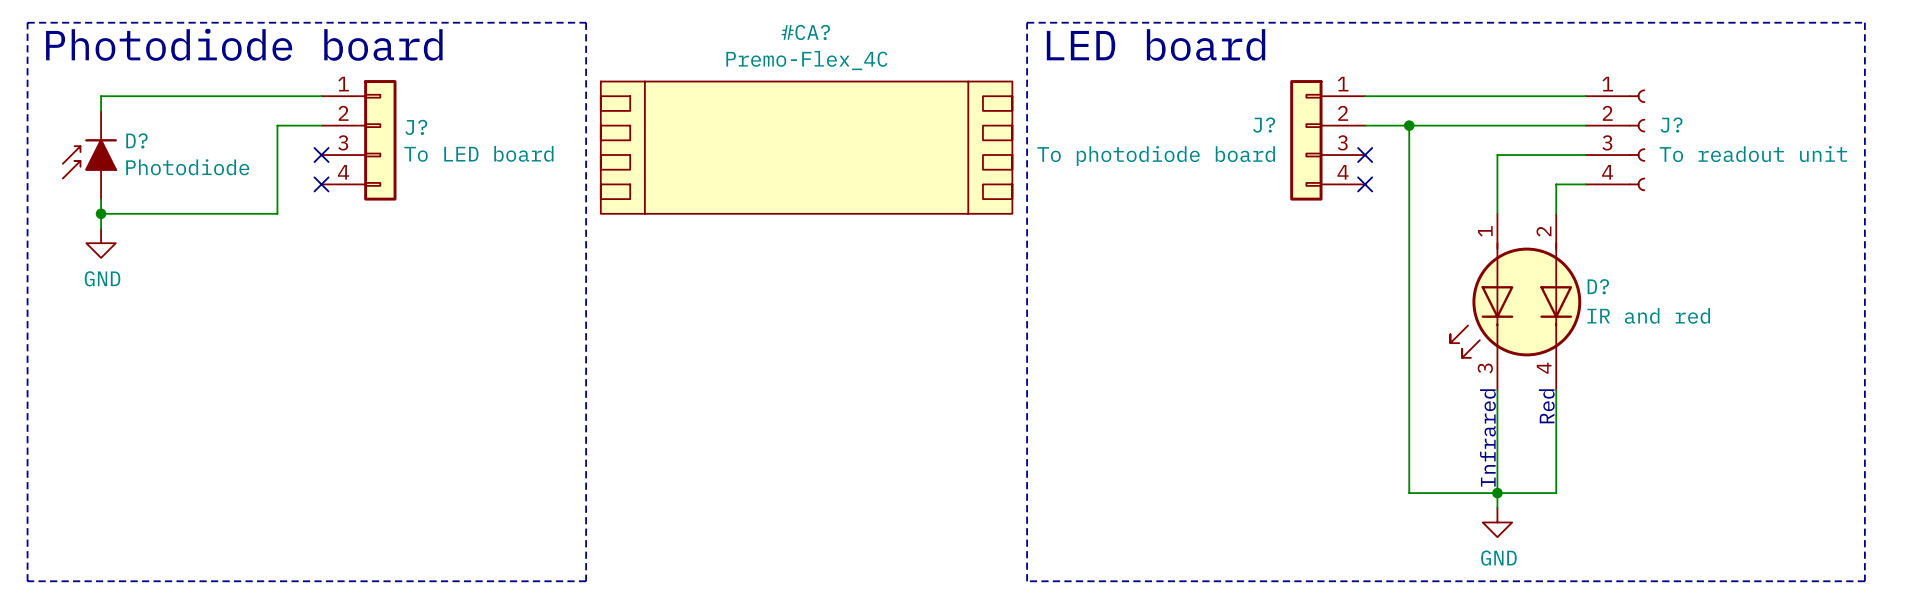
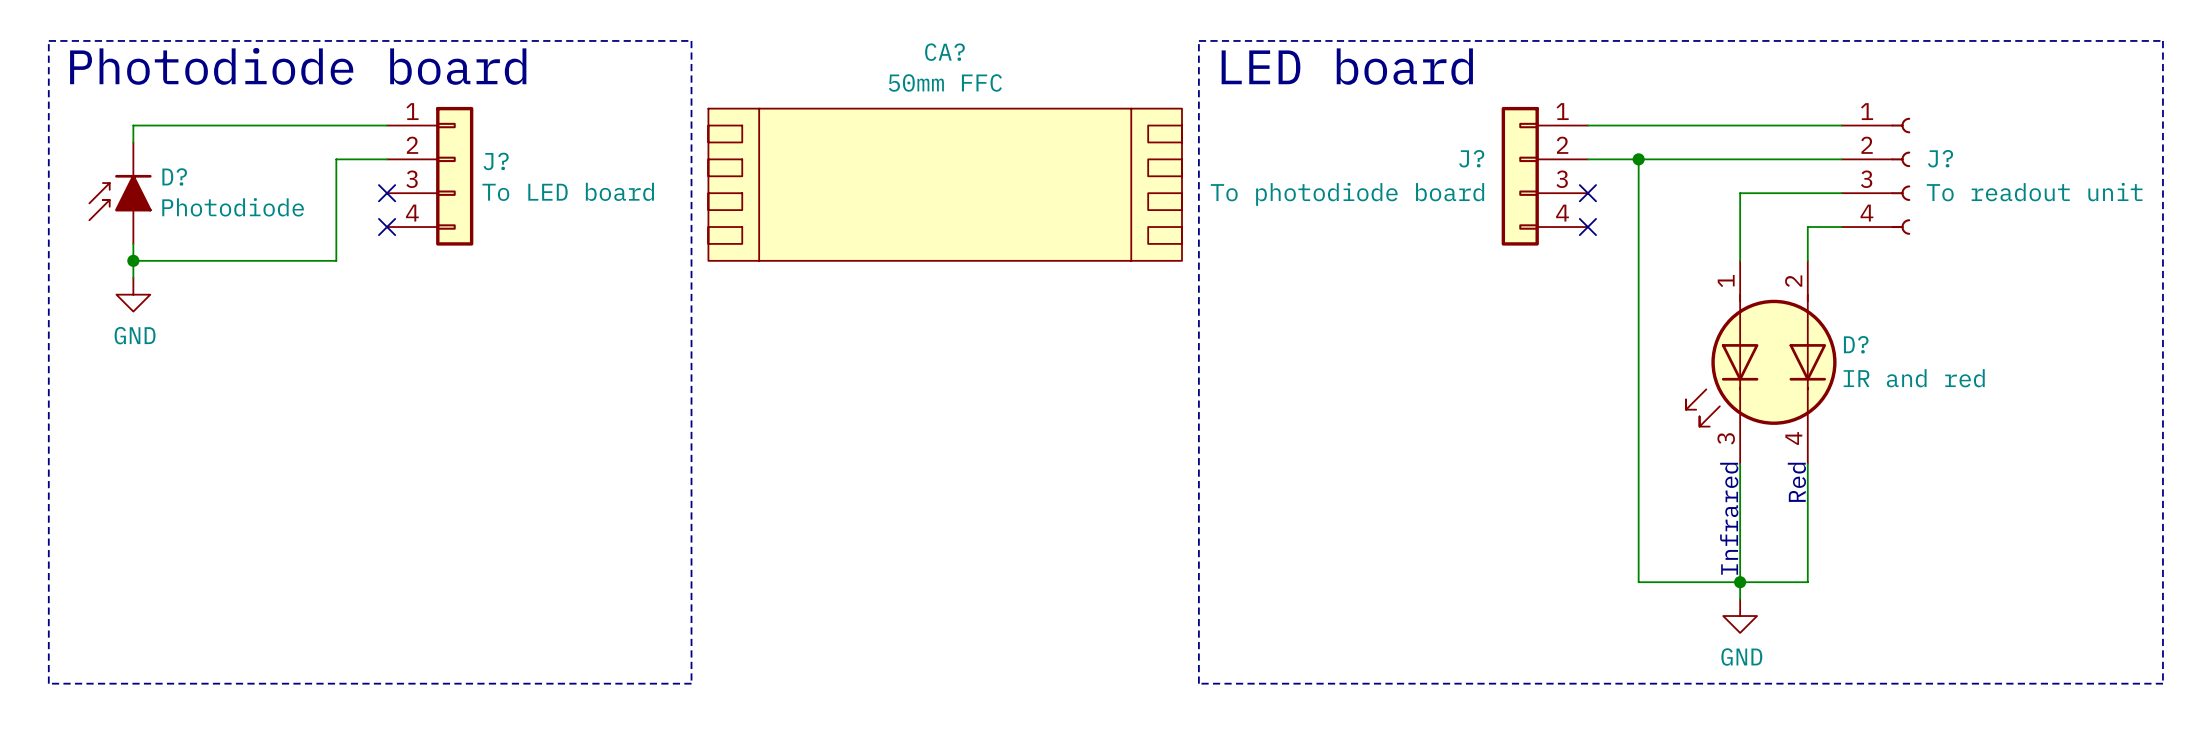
#CA?: Premo-Flex_4C (806, 147) -> none
CA?: none -> 50mm FFC (945, 184)

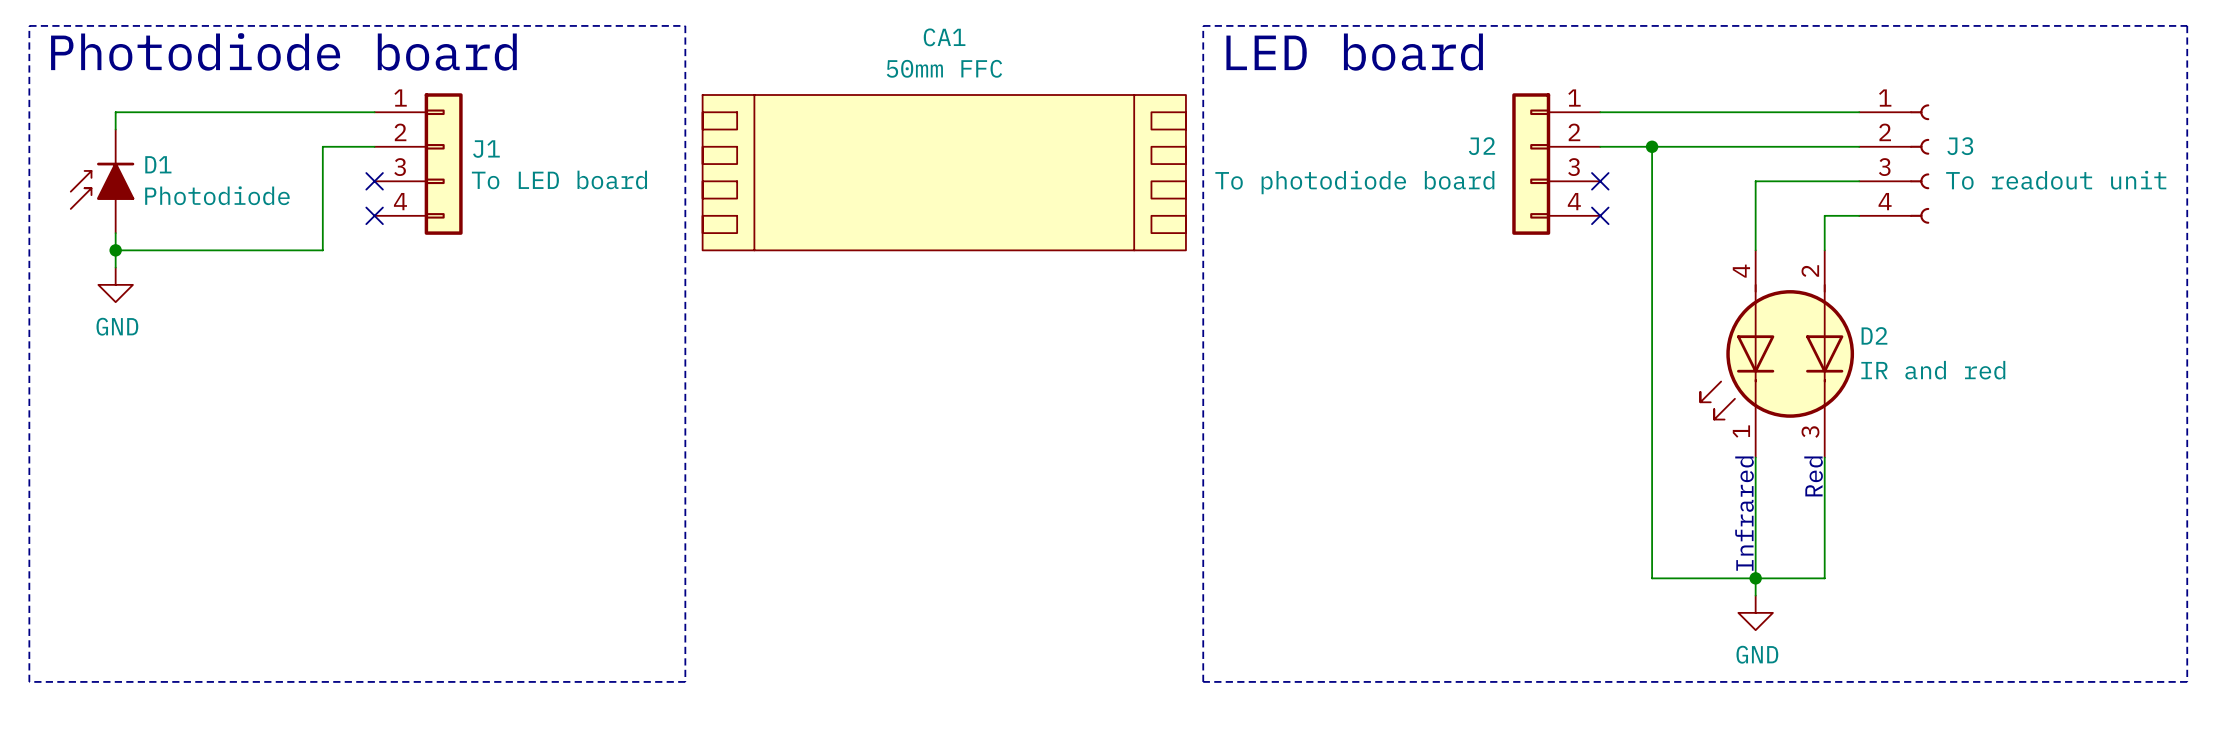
CA? name: CA? (944, 52) -> CA1 (944, 37)
J? name: J? (1471, 158) -> J2 (1482, 146)
J? name: J? (1940, 158) -> J3 (1960, 146)
J? name: J? (496, 161) -> J1 (486, 149)
D? name: D? (174, 176) -> D1 (158, 164)
D? pin number: 1 (1726, 281) -> 4 (1741, 271)
D? name: D? (1856, 344) -> D2 (1874, 335)
D? pin number: 3 (1726, 438) -> 1 (1741, 431)
D? pin number: 4 (1793, 438) -> 3 (1810, 432)

